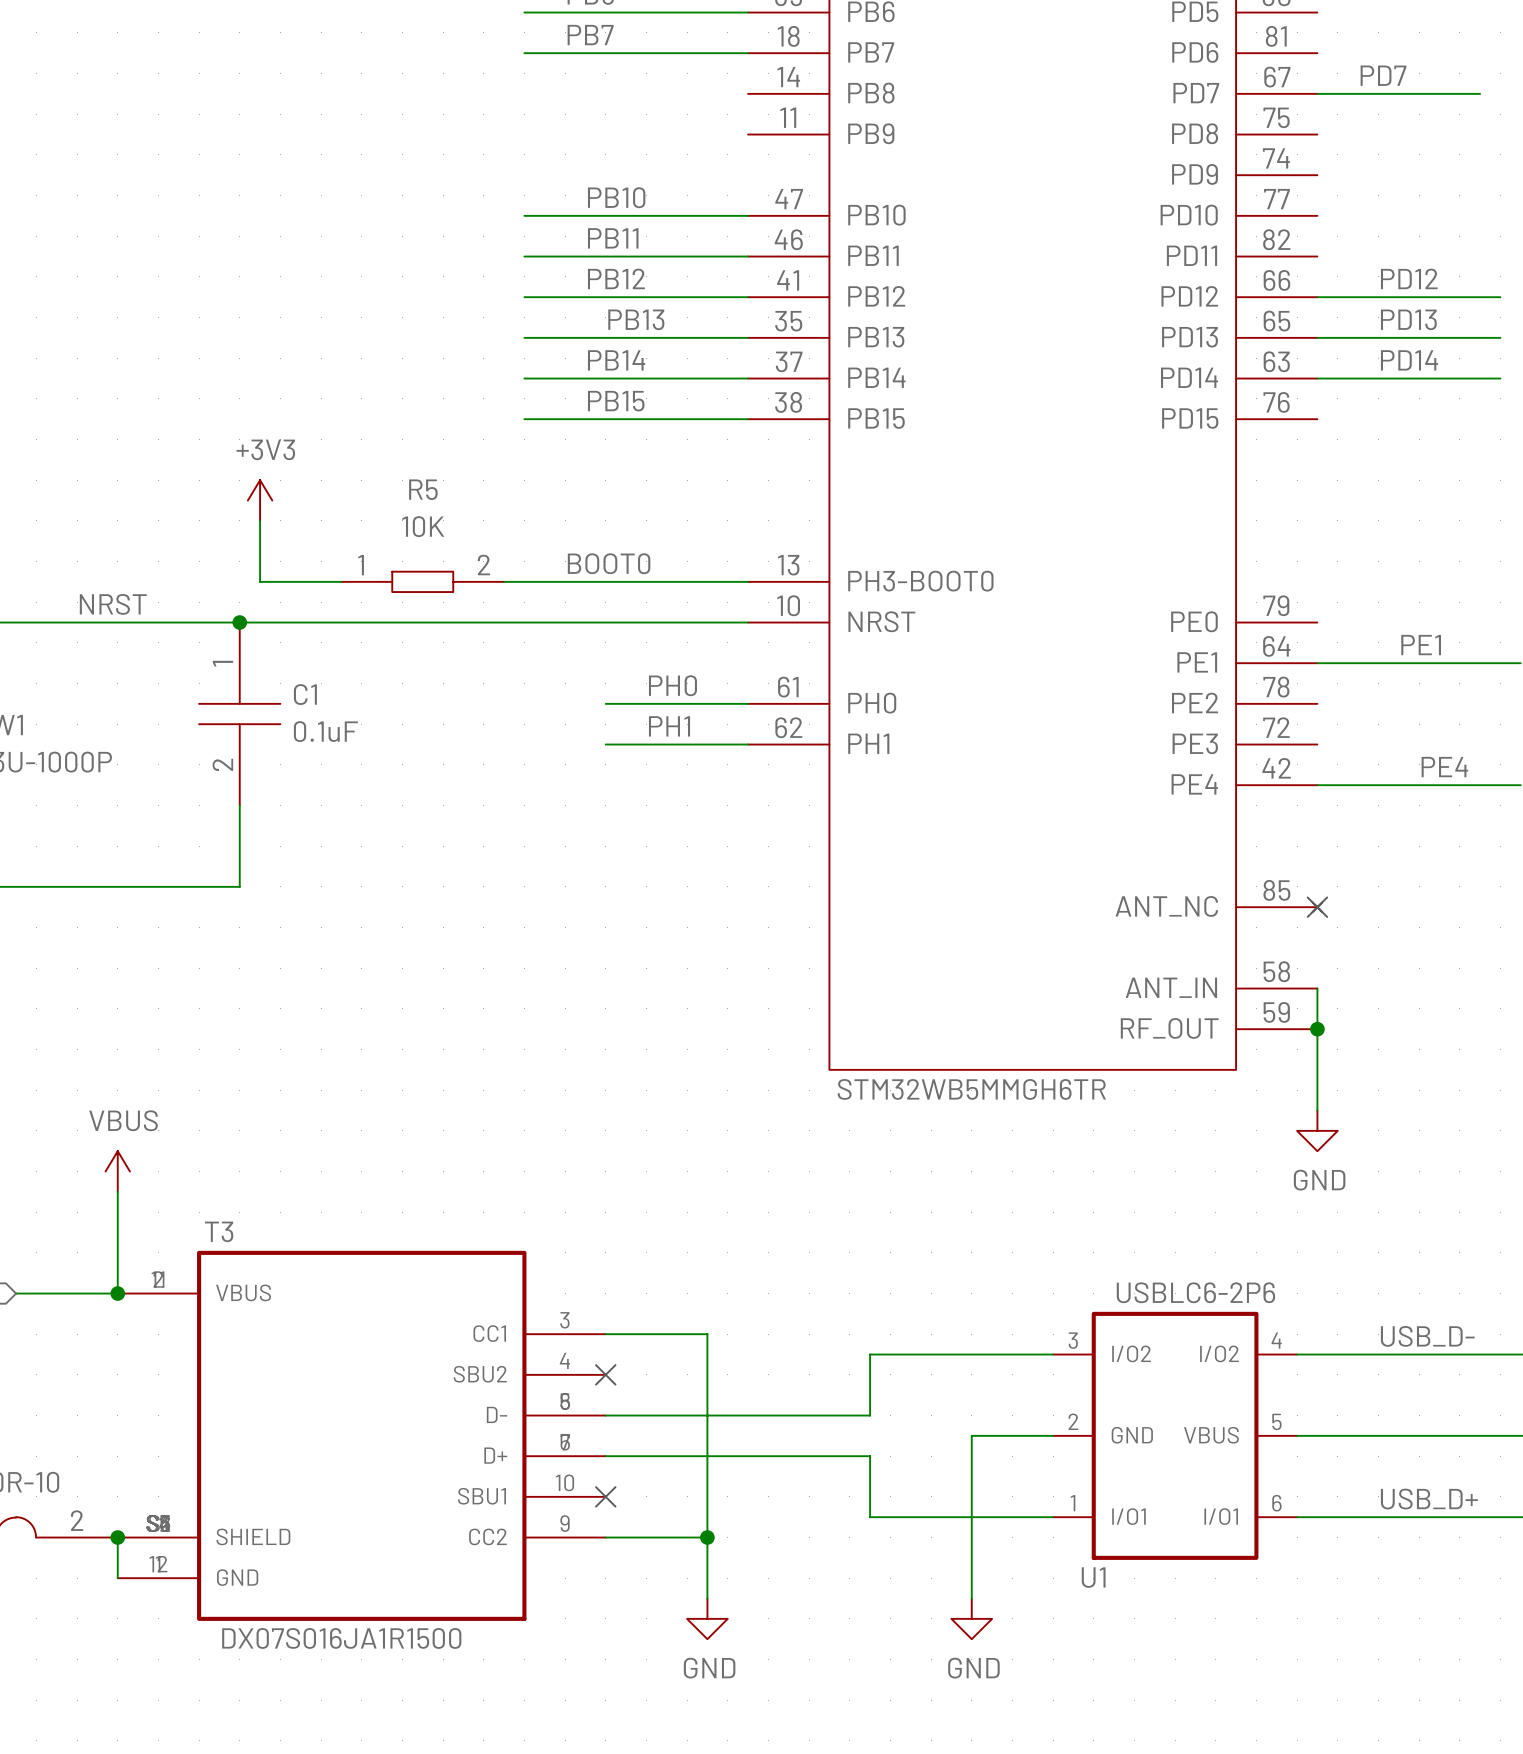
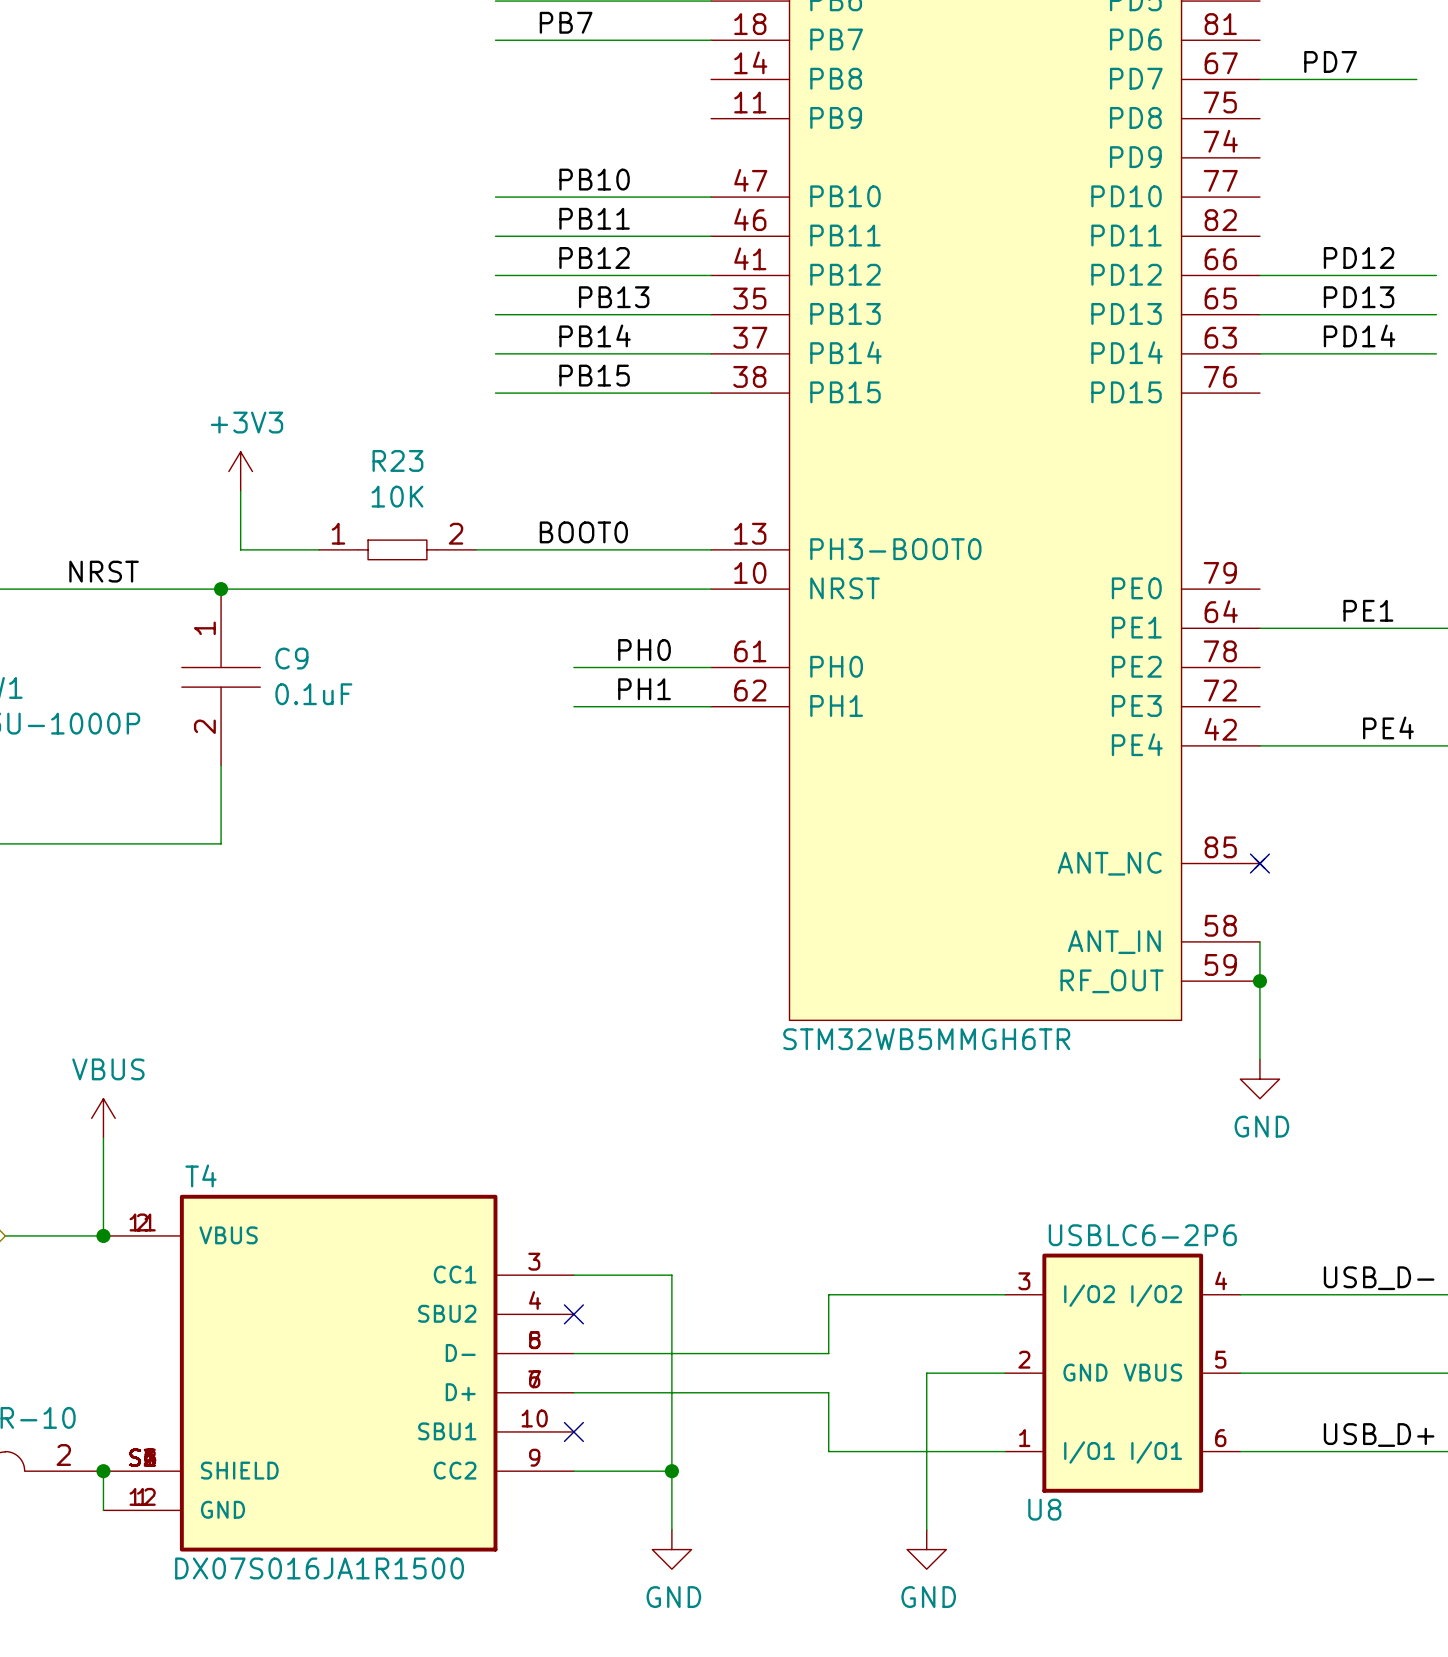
R5 name: R5 (423, 489) -> R23 (397, 460)
C1 name: C1 (305, 694) -> C9 (291, 658)
T3 name: T3 (219, 1231) -> T4 (200, 1175)
U1 name: U1 (1093, 1577) -> U8 (1044, 1509)

